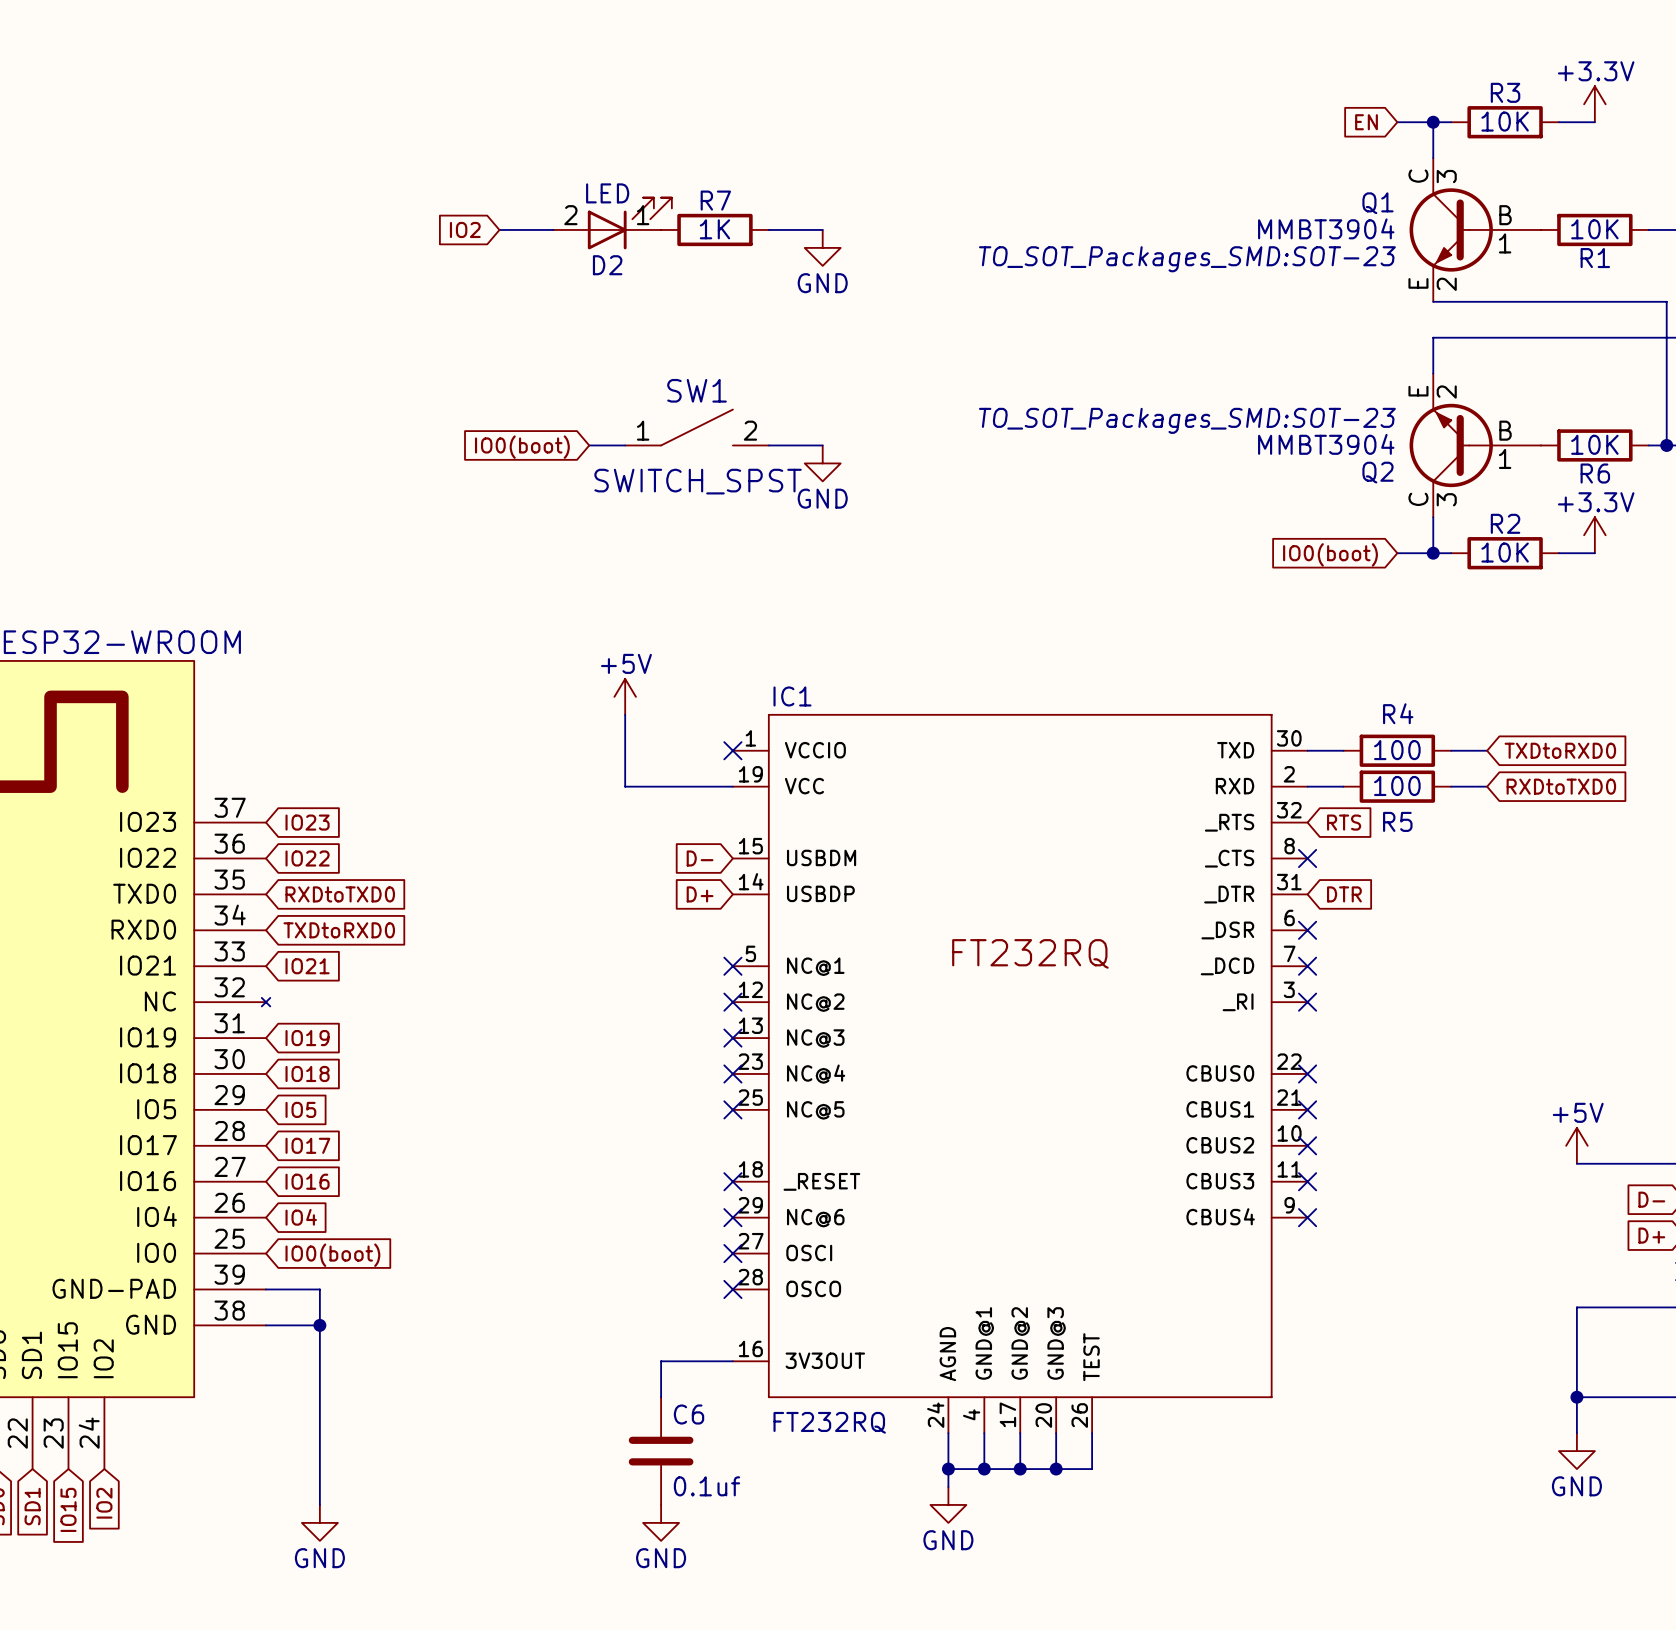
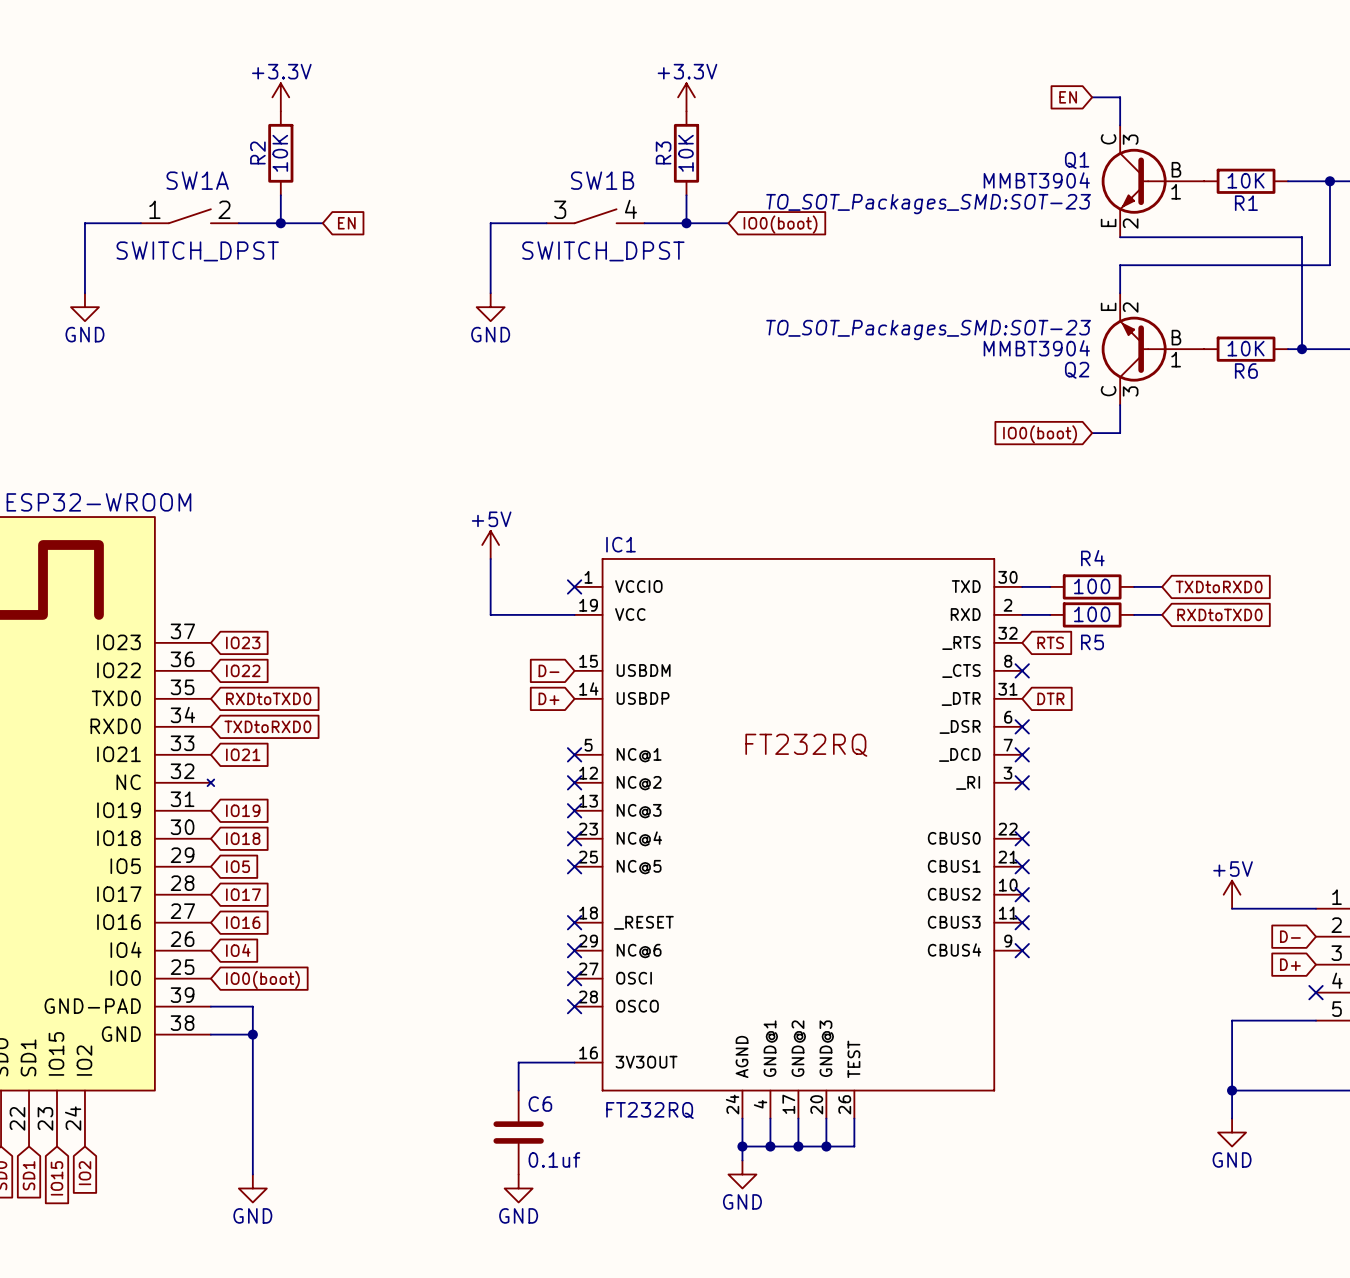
R3 name position: R3 (1505, 92) -> R3 (663, 152)
power symbol: +3.3V (1594, 104) -> none
power symbol: none -> +3.3V (280, 97)
power symbol: none -> +3.3V (686, 97)
wire: (1433, 122) (1451, 122) -> none
junction: (1433, 122) -> none
R3 rotation: 0° (1505, 122) -> 90° clockwise (686, 153)
R3 position: (1505, 122) -> (686, 153)
wire: (1558, 122) (1594, 122) -> none
D2: LED (612, 223) -> none
global label: IO2 (465, 229) -> none
wire: (499, 229) (553, 229) -> none
R7: 1K (714, 229) -> none
wire: (768, 229) (822, 229) -> none
wire: none -> (280, 195) (280, 223)
power symbol: GND (822, 247) -> none
wire: none -> (686, 195) (686, 223)
SW1A: none -> SWITCH_DPST (189, 216)
SW1B: none -> SWITCH_DPST (595, 216)
wire: none -> (140, 223) (84, 223) (84, 293)
wire: none -> (238, 223) (322, 223)
junction: none -> (280, 223)
global label: none -> EN (346, 223)
wire: none -> (546, 223) (490, 223) (490, 293)
wire: none -> (644, 223) (728, 223)
junction: none -> (686, 223)
global label: none -> IO0(boot) (780, 224)
power symbol: none -> GND (84, 307)
power symbol: none -> GND (490, 307)
SW1: SWITCH_SPST (697, 427) -> none
wire: (589, 445) (625, 445) -> none
wire: (768, 445) (822, 445) -> none
global label: IO0(boot) (522, 447) -> none
power symbol: GND (822, 463) -> none
R2 name position: R2 (1505, 523) -> R2 (257, 152)
power symbol: +3.3V (1594, 535) -> none
wire: (1433, 553) (1451, 553) -> none
junction: (1433, 553) -> none
R2 rotation: 0° (1505, 553) -> 90° clockwise (280, 153)
R2 position: (1505, 553) -> (280, 153)
wire: (1558, 553) (1594, 553) -> none

